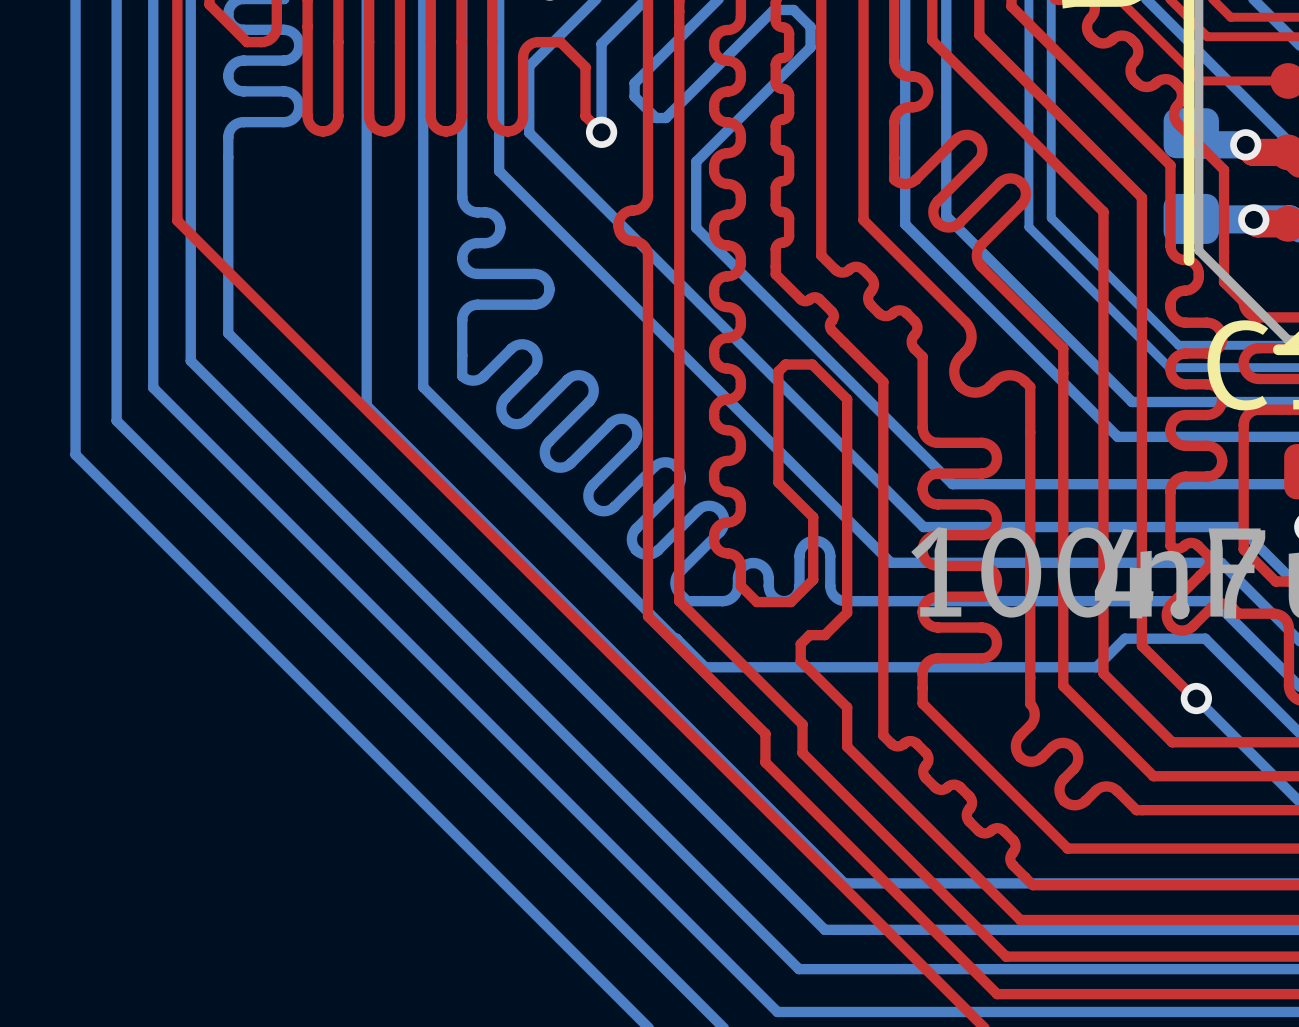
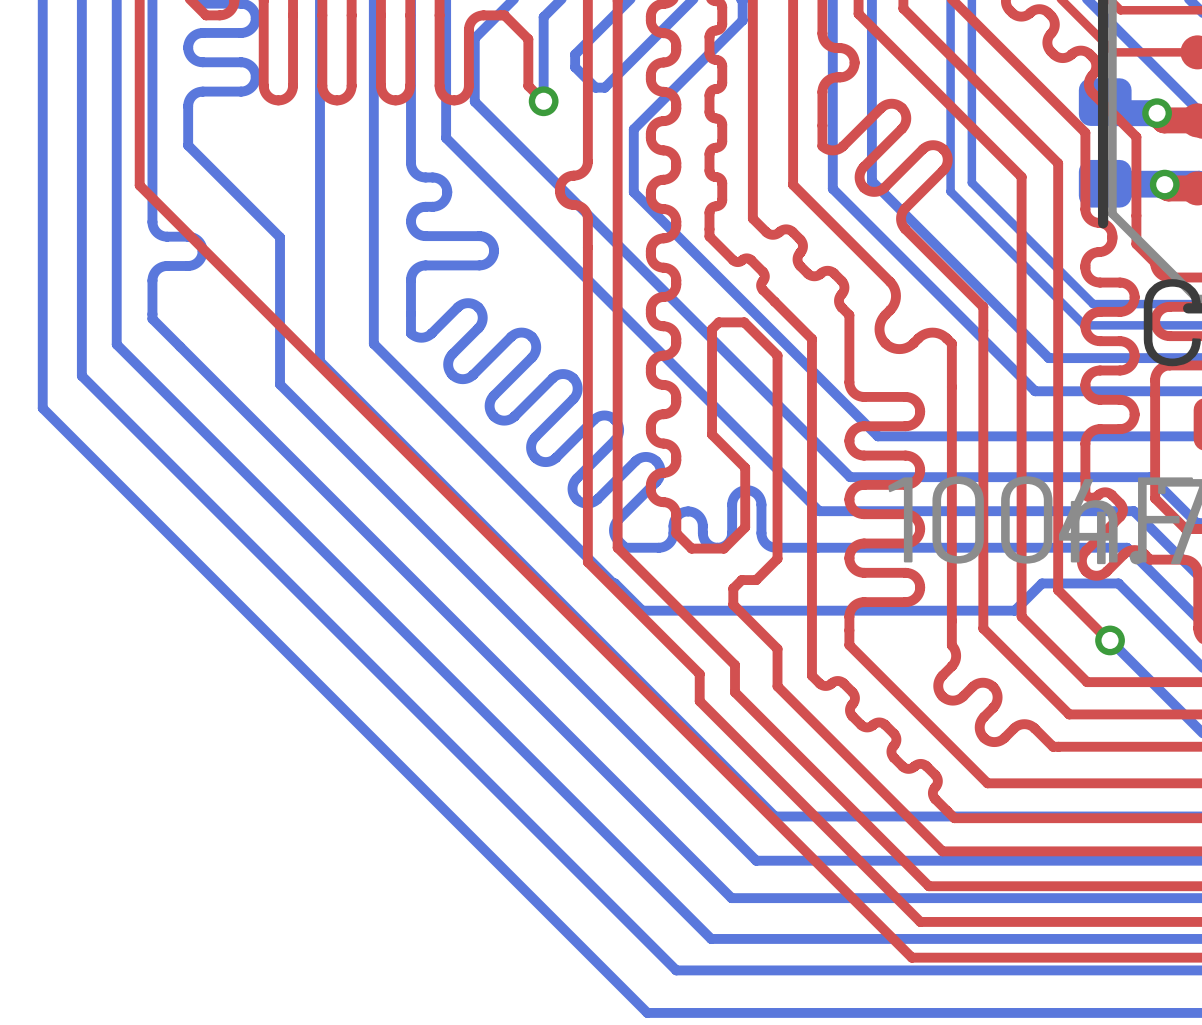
bottom track: (228, 178) (228, 333) (324, 429) -> (188, 145) (280, 237) (280, 384)
bottom track: (190, 259) (190, 320) -> (152, 222) (154, 229) (161, 235) (195, 238) (200, 244) (202, 251) (200, 258) (195, 264) (161, 267) (155, 271) (152, 280)

